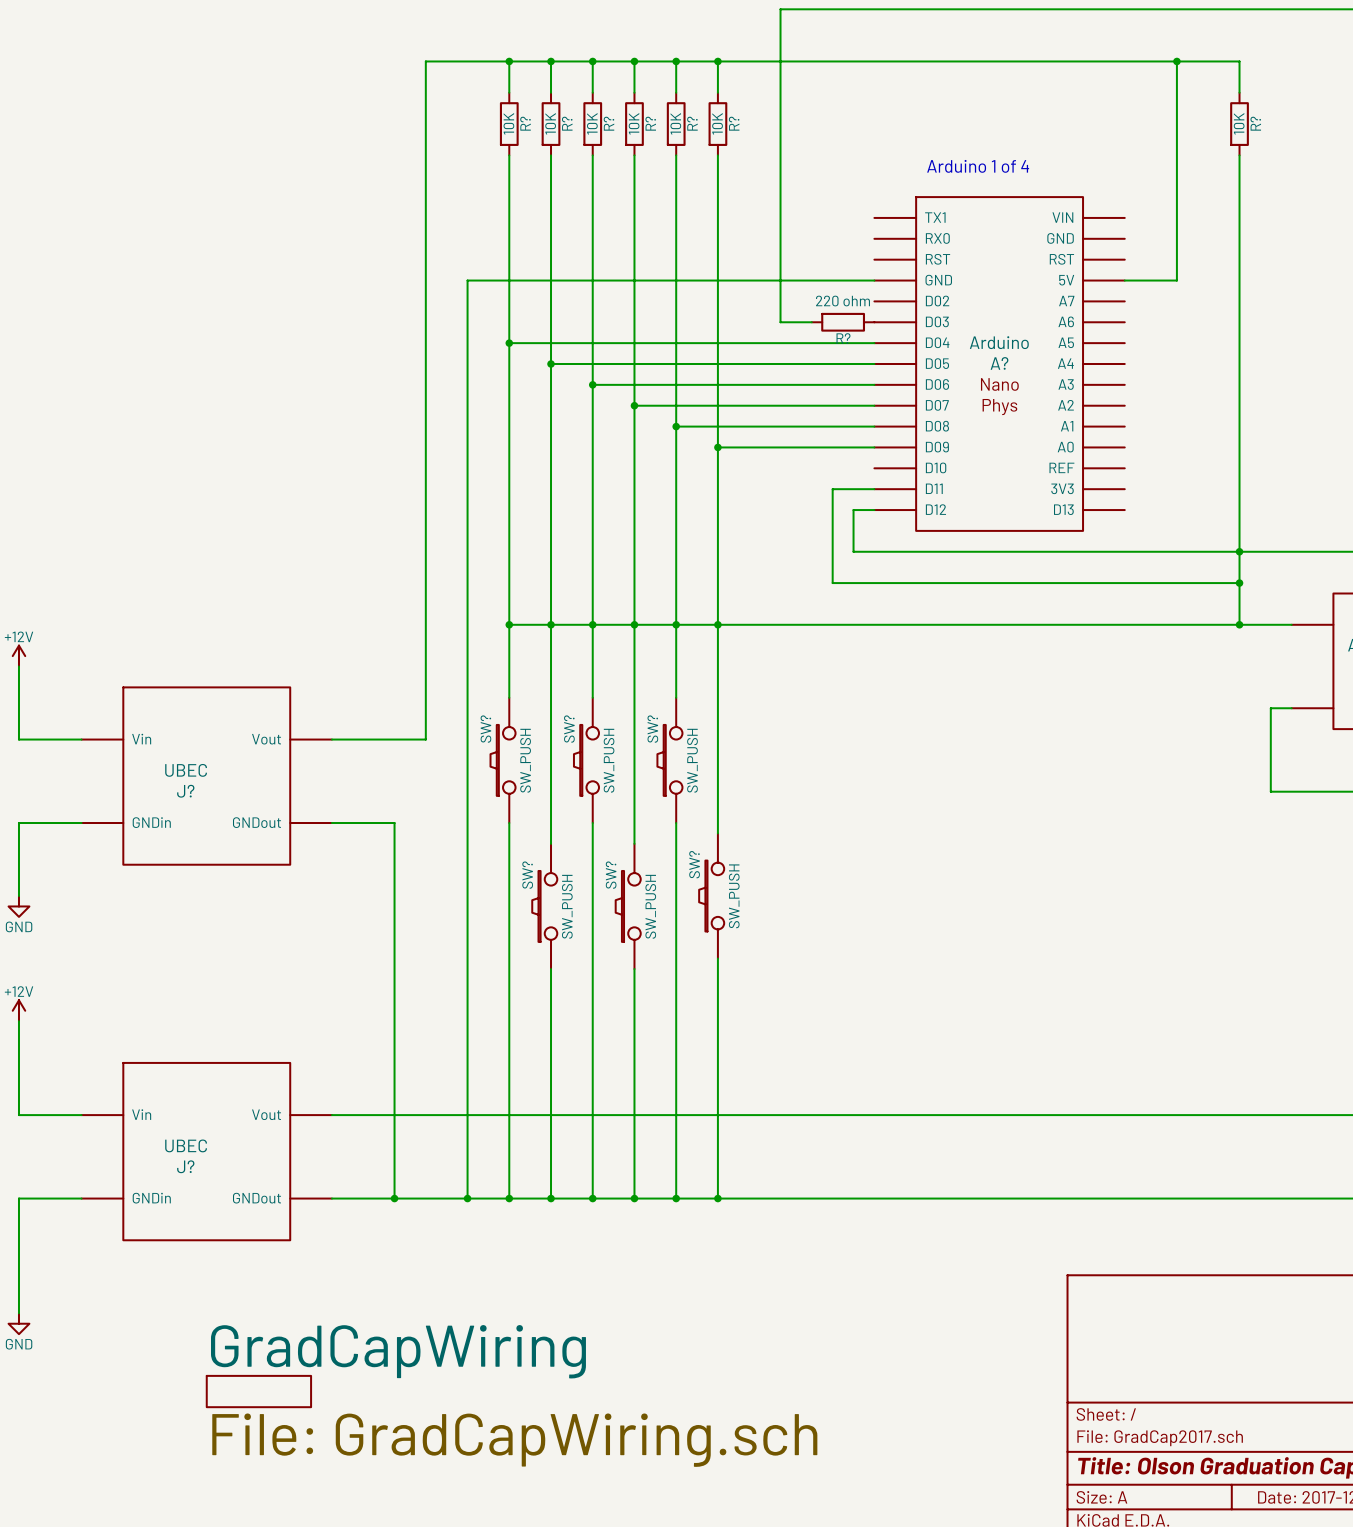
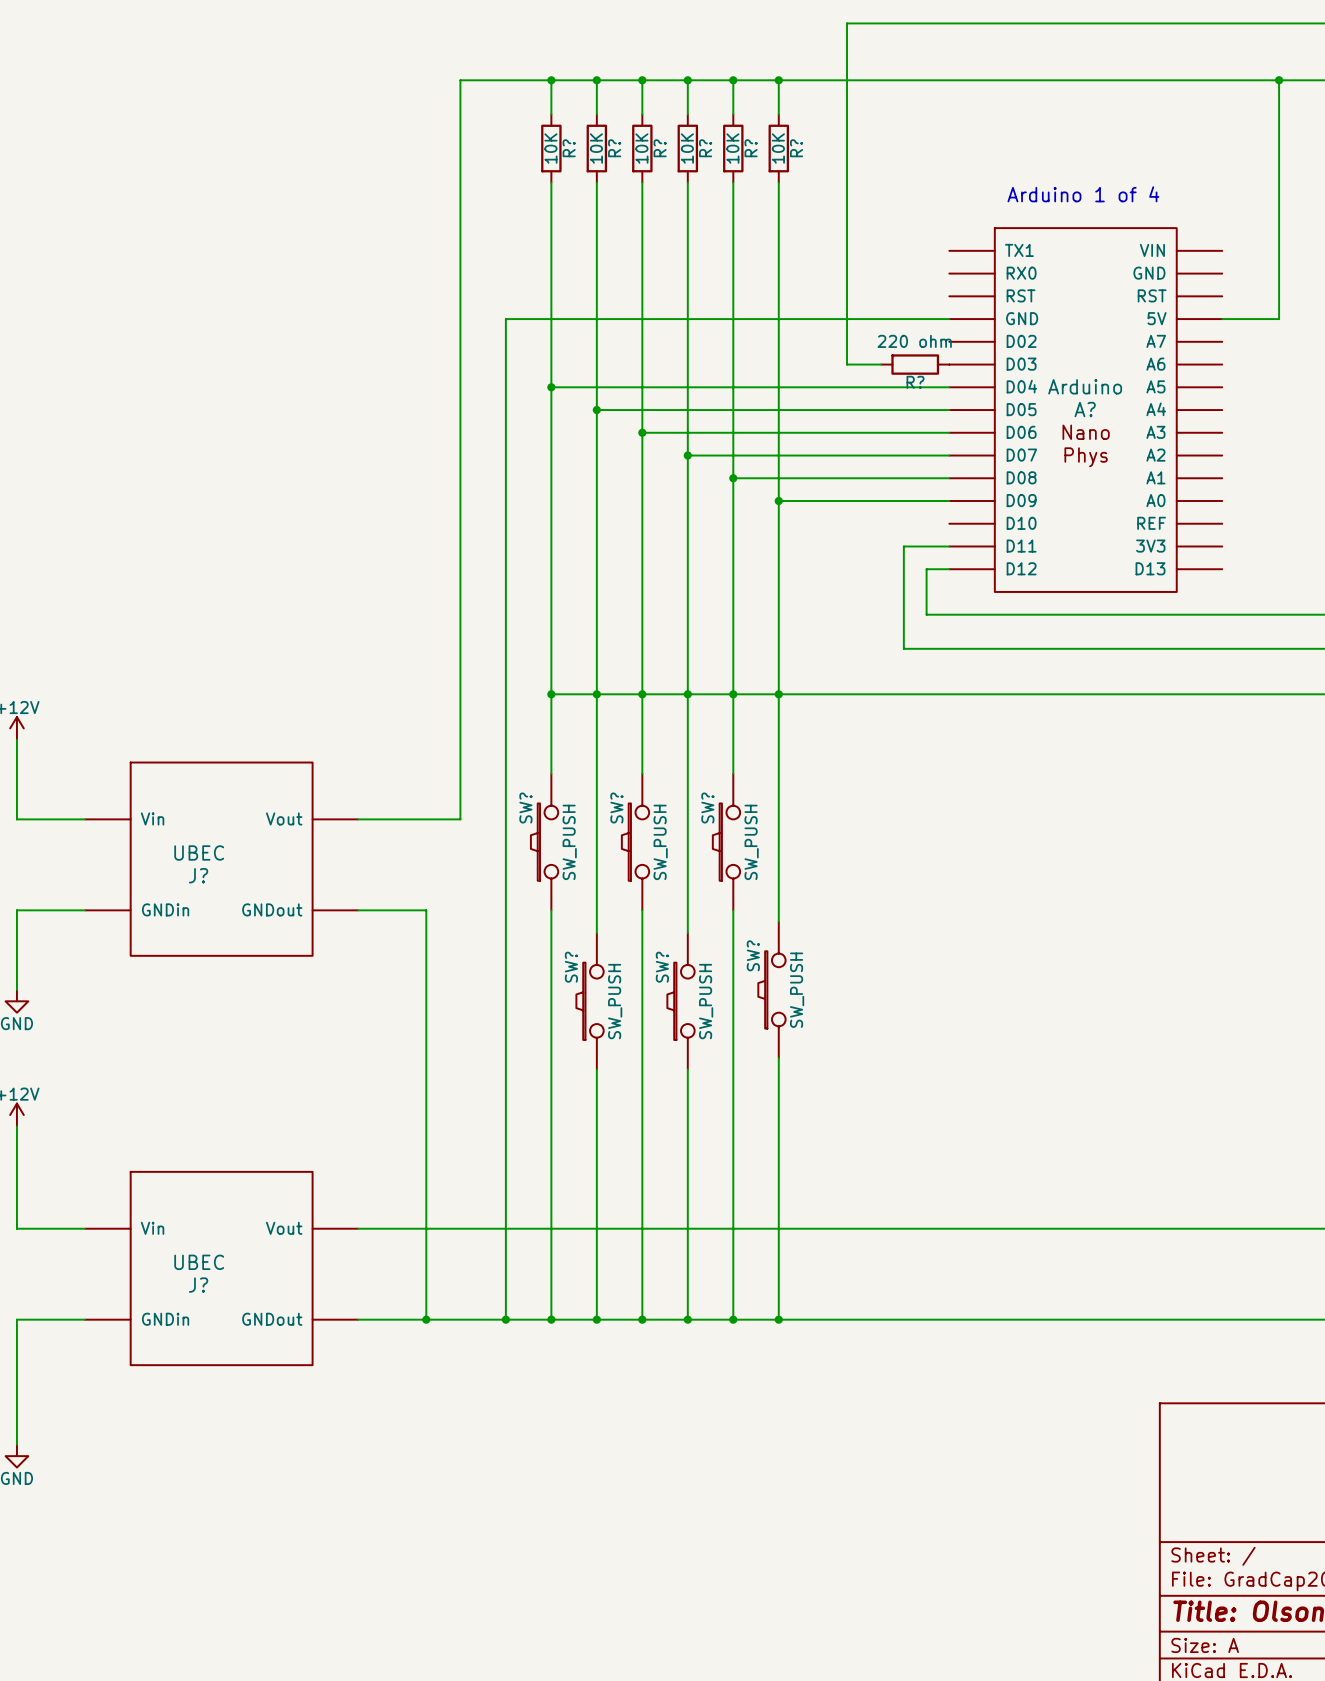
sheet GradCapWiring: File: GradCapWiring.sch (258, 1391) -> none

